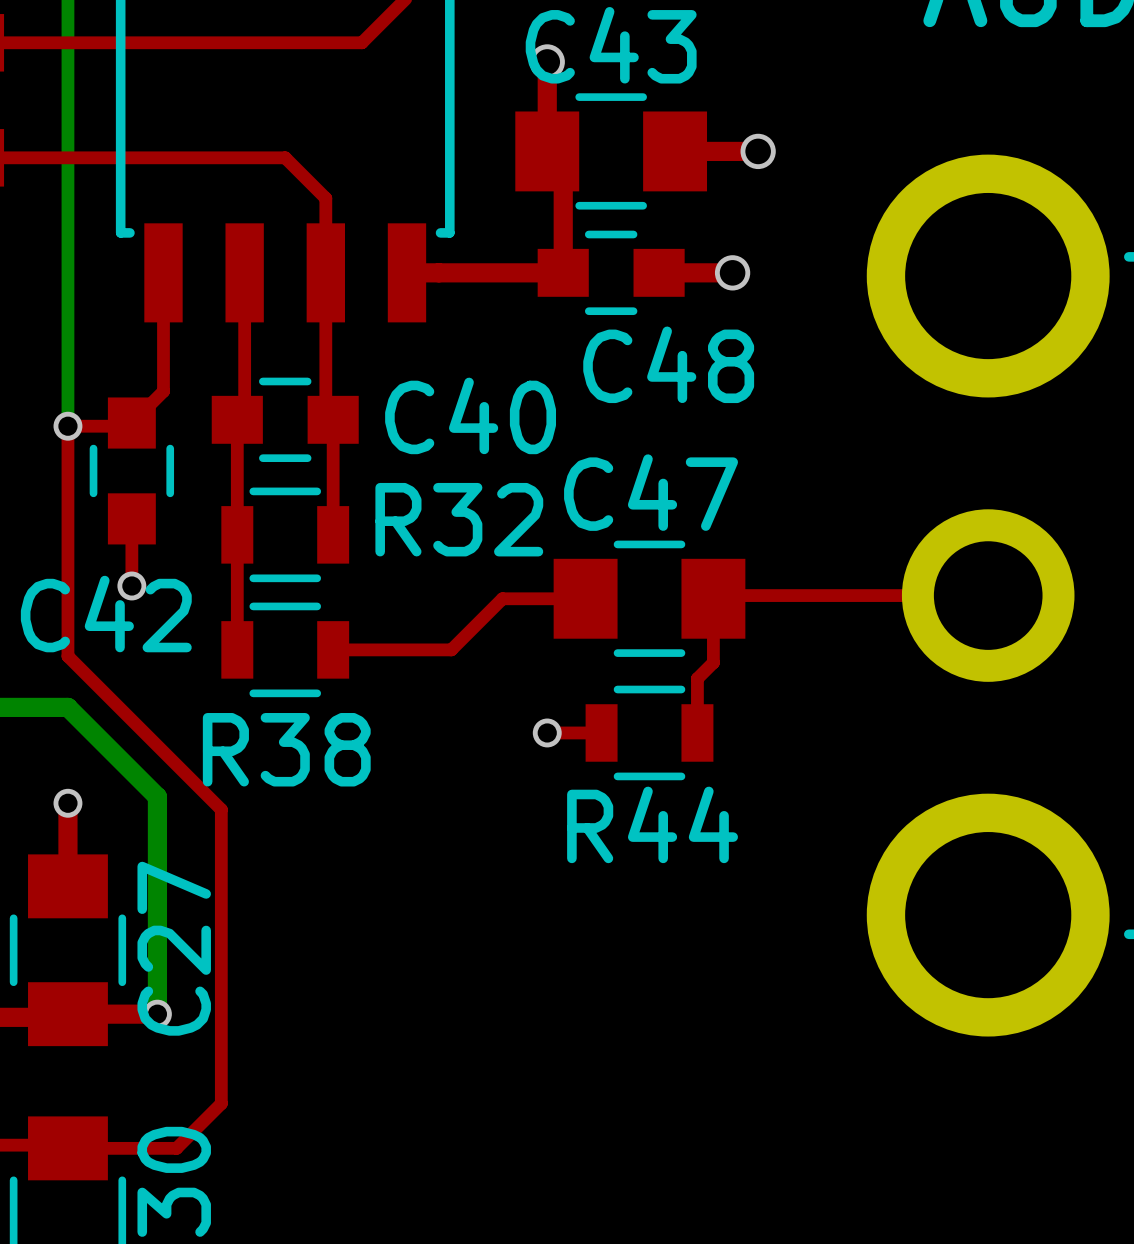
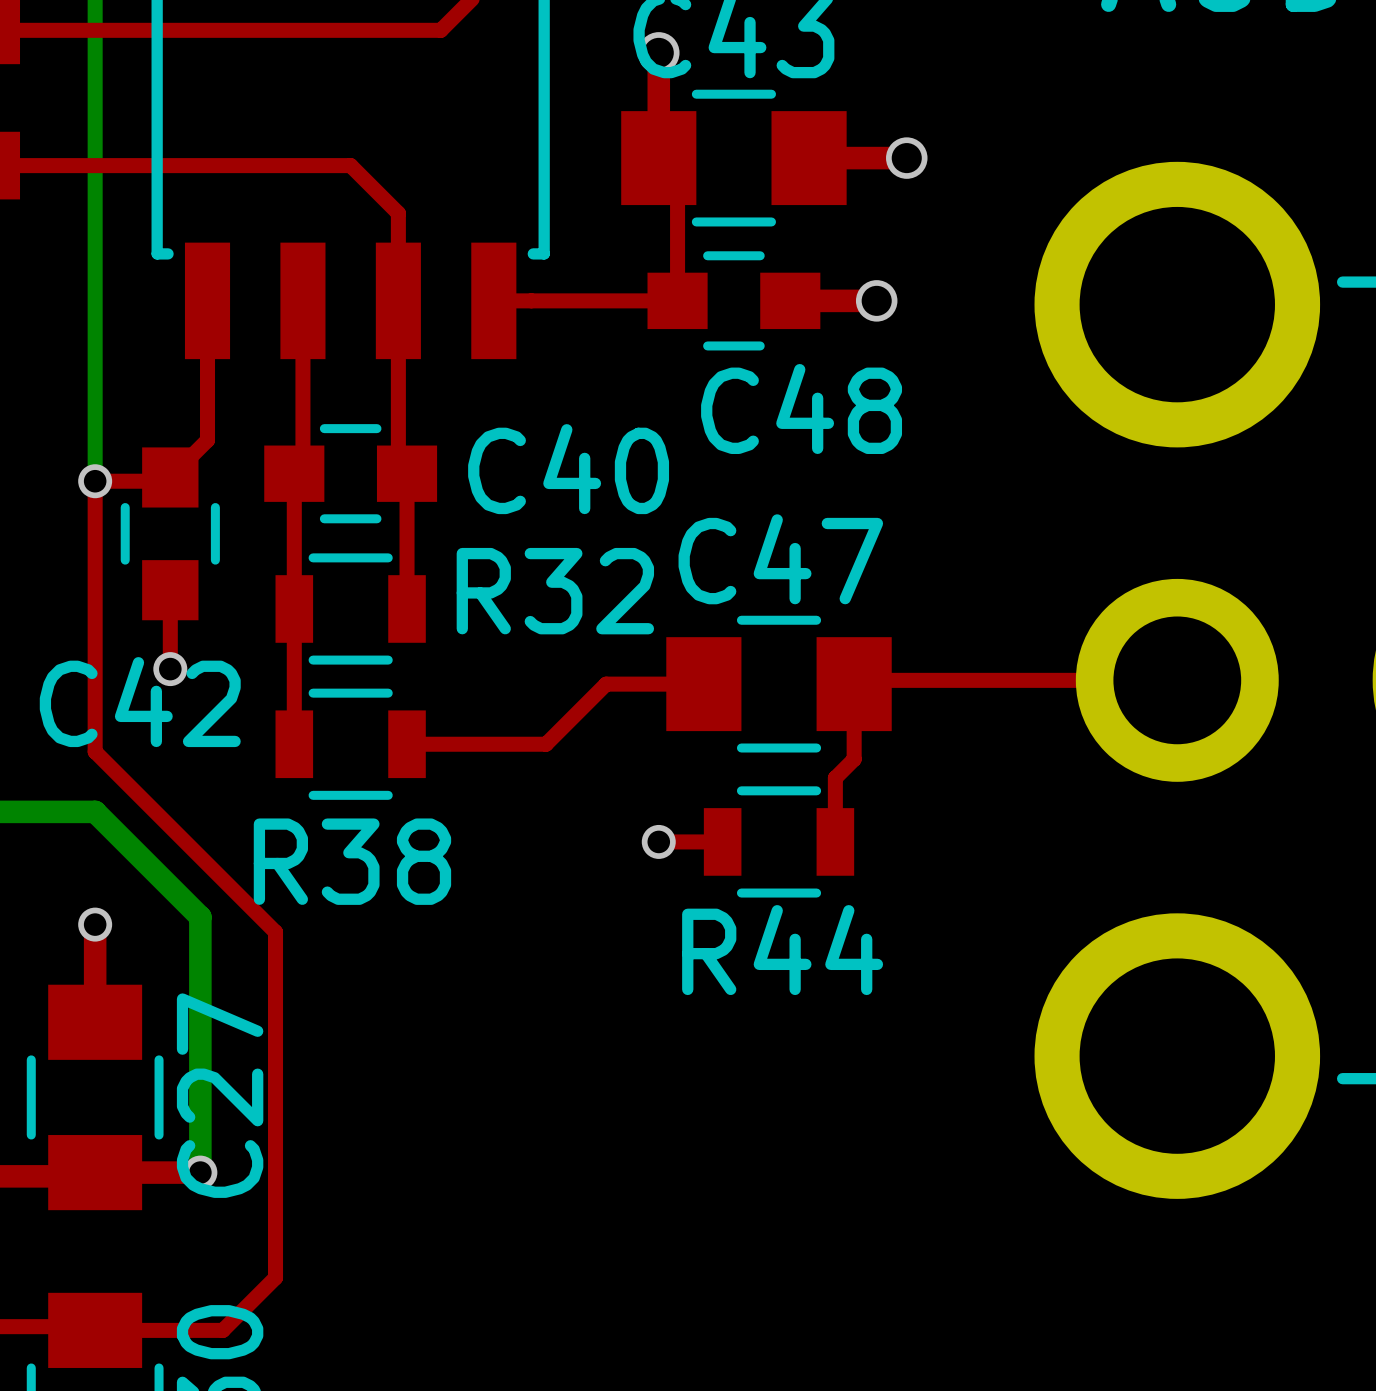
top track width: thick (563, 167) (563, 272) (406, 272) -> thin (677, 176) (677, 300) (493, 300)

